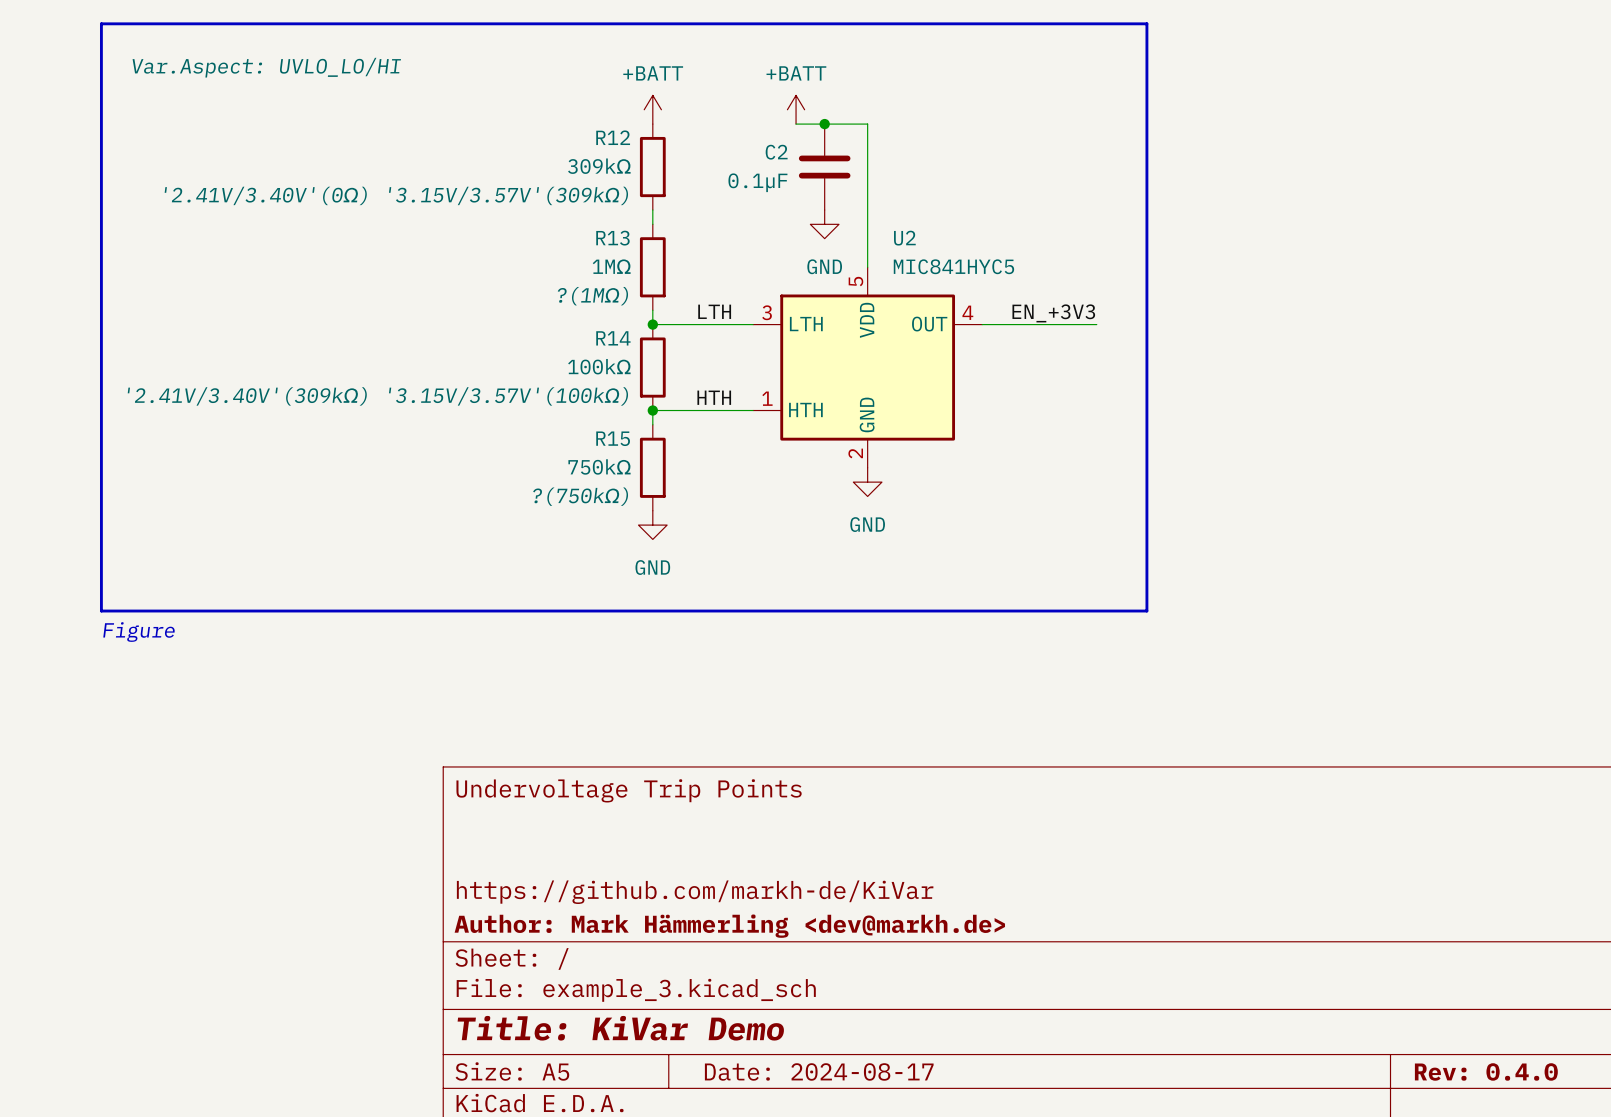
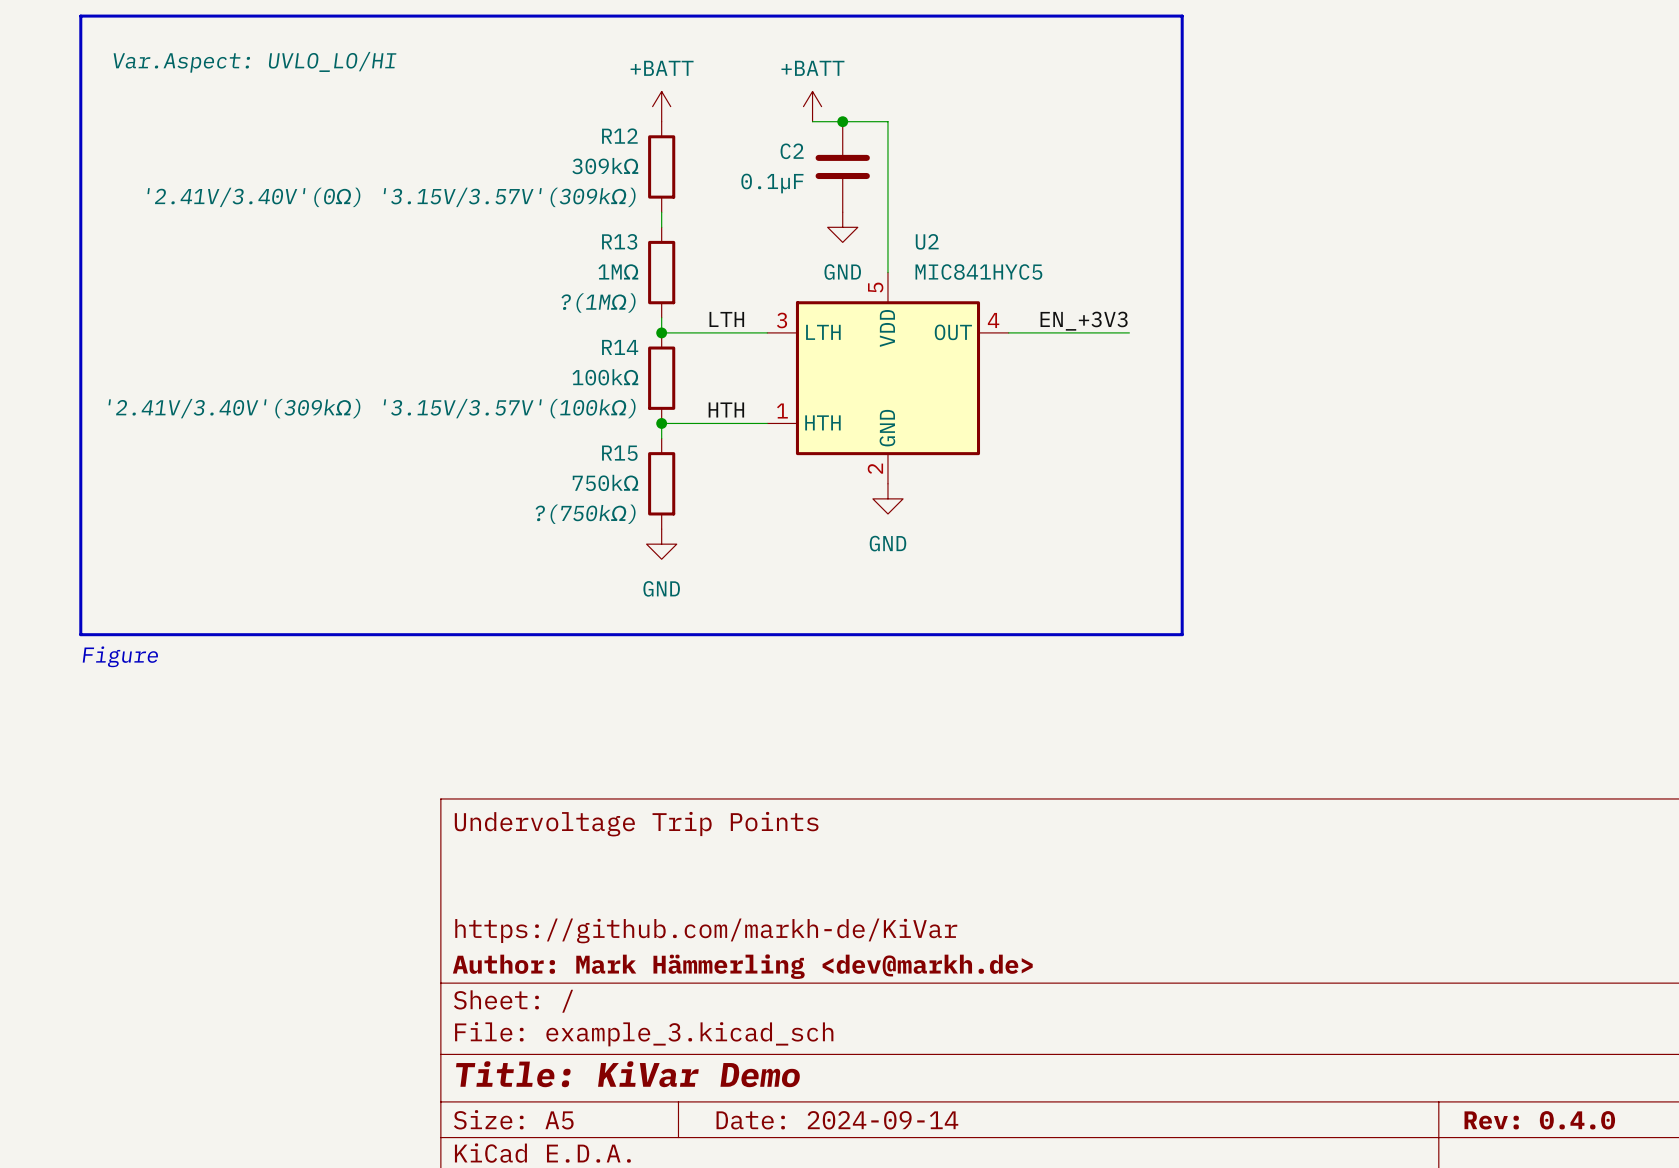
title block: Date: 2024-08-17 (819, 1071) -> Date: 2024-09-14 (837, 1120)

